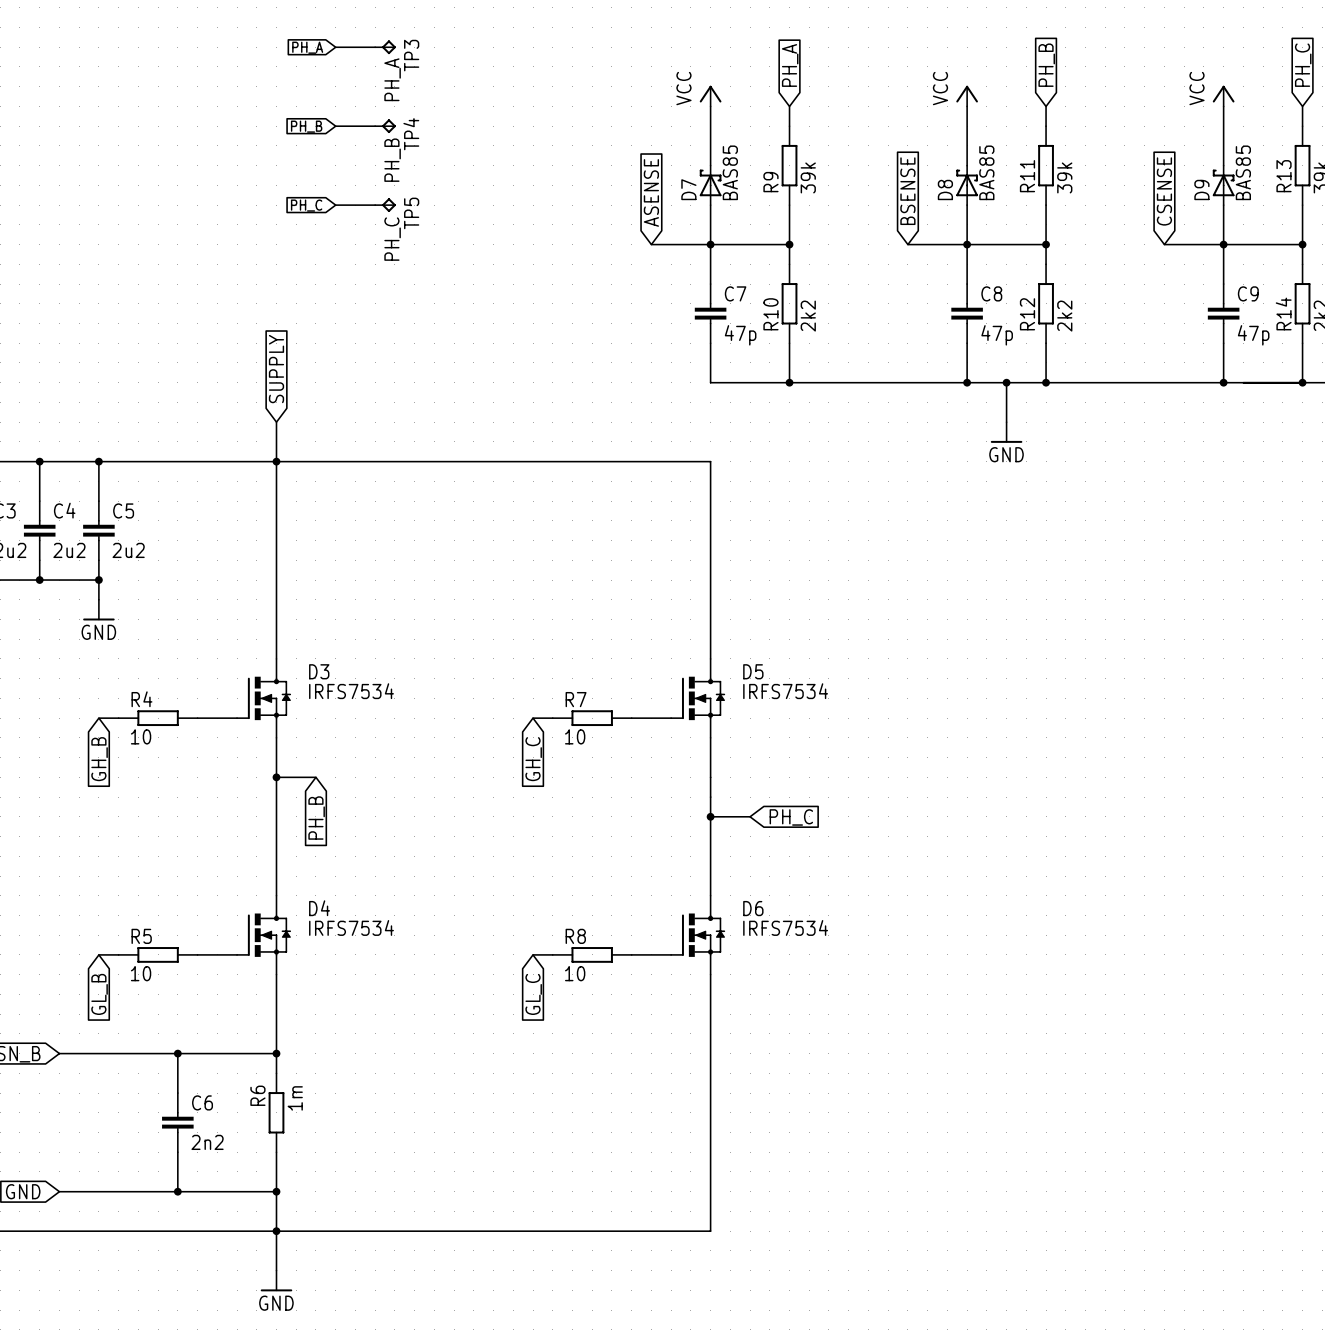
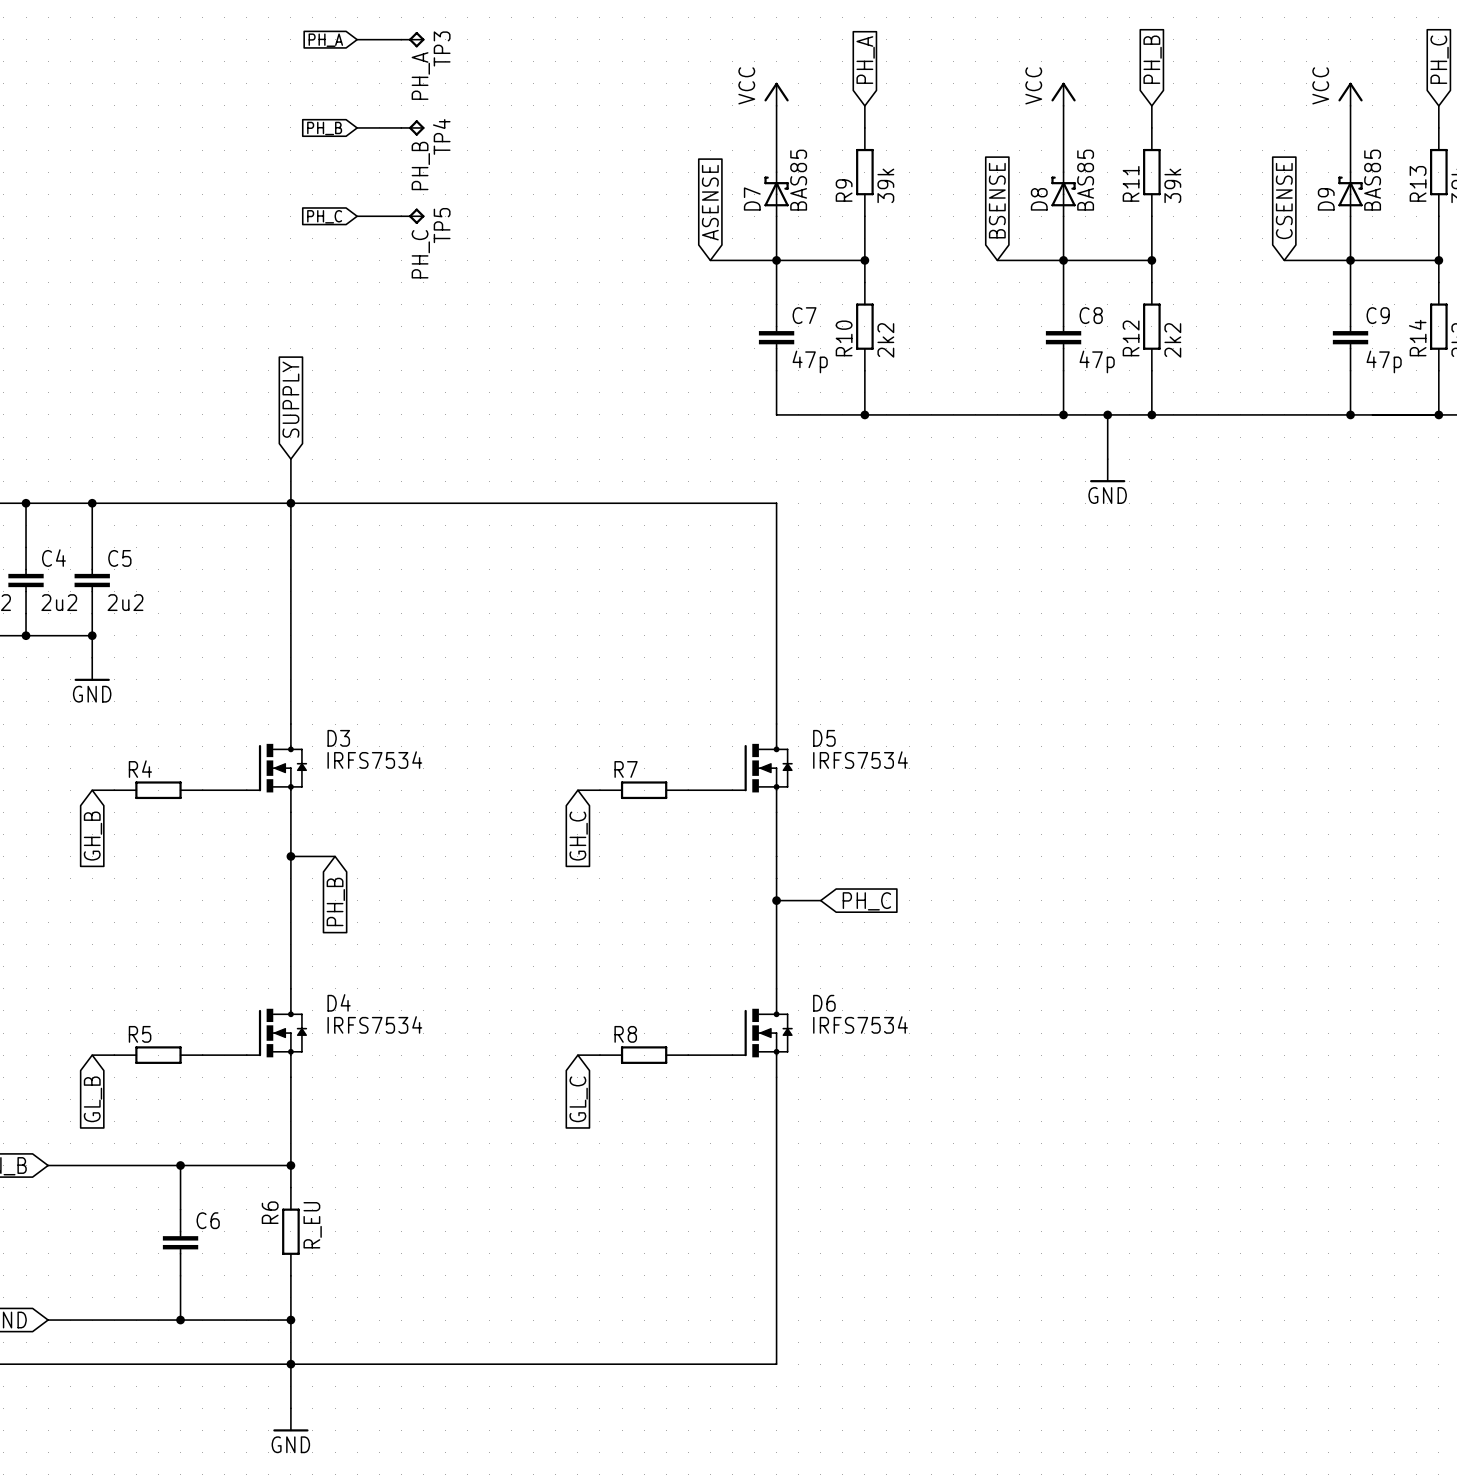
R4 value: 10 (141, 736) -> none
R7 value: 10 (575, 736) -> none
R5 value: 10 (141, 973) -> none
R8 value: 10 (575, 973) -> none
R6 value: 1m (295, 1098) -> R_EU (312, 1225)
C6 value: 2n2 (207, 1142) -> none

